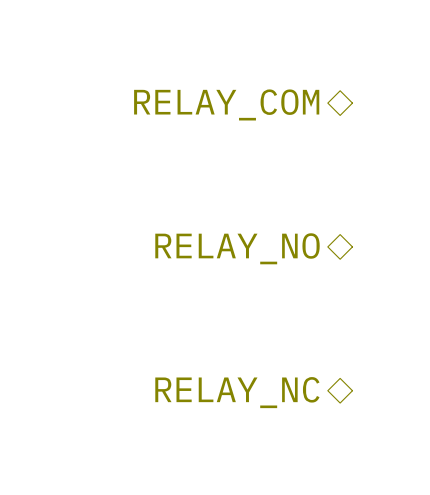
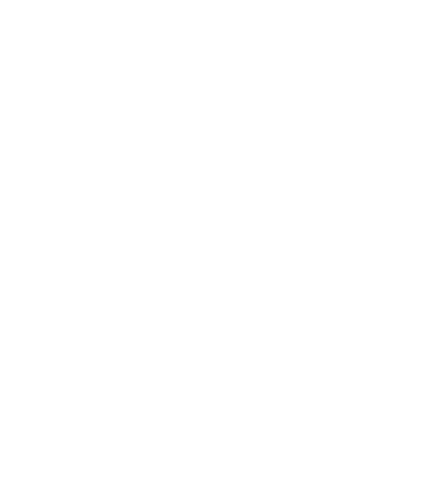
hierarchical label: RELAY_COM (226, 104) -> none
hierarchical label: RELAY_NO (237, 248) -> none
hierarchical label: RELAY_NC (237, 392) -> none

